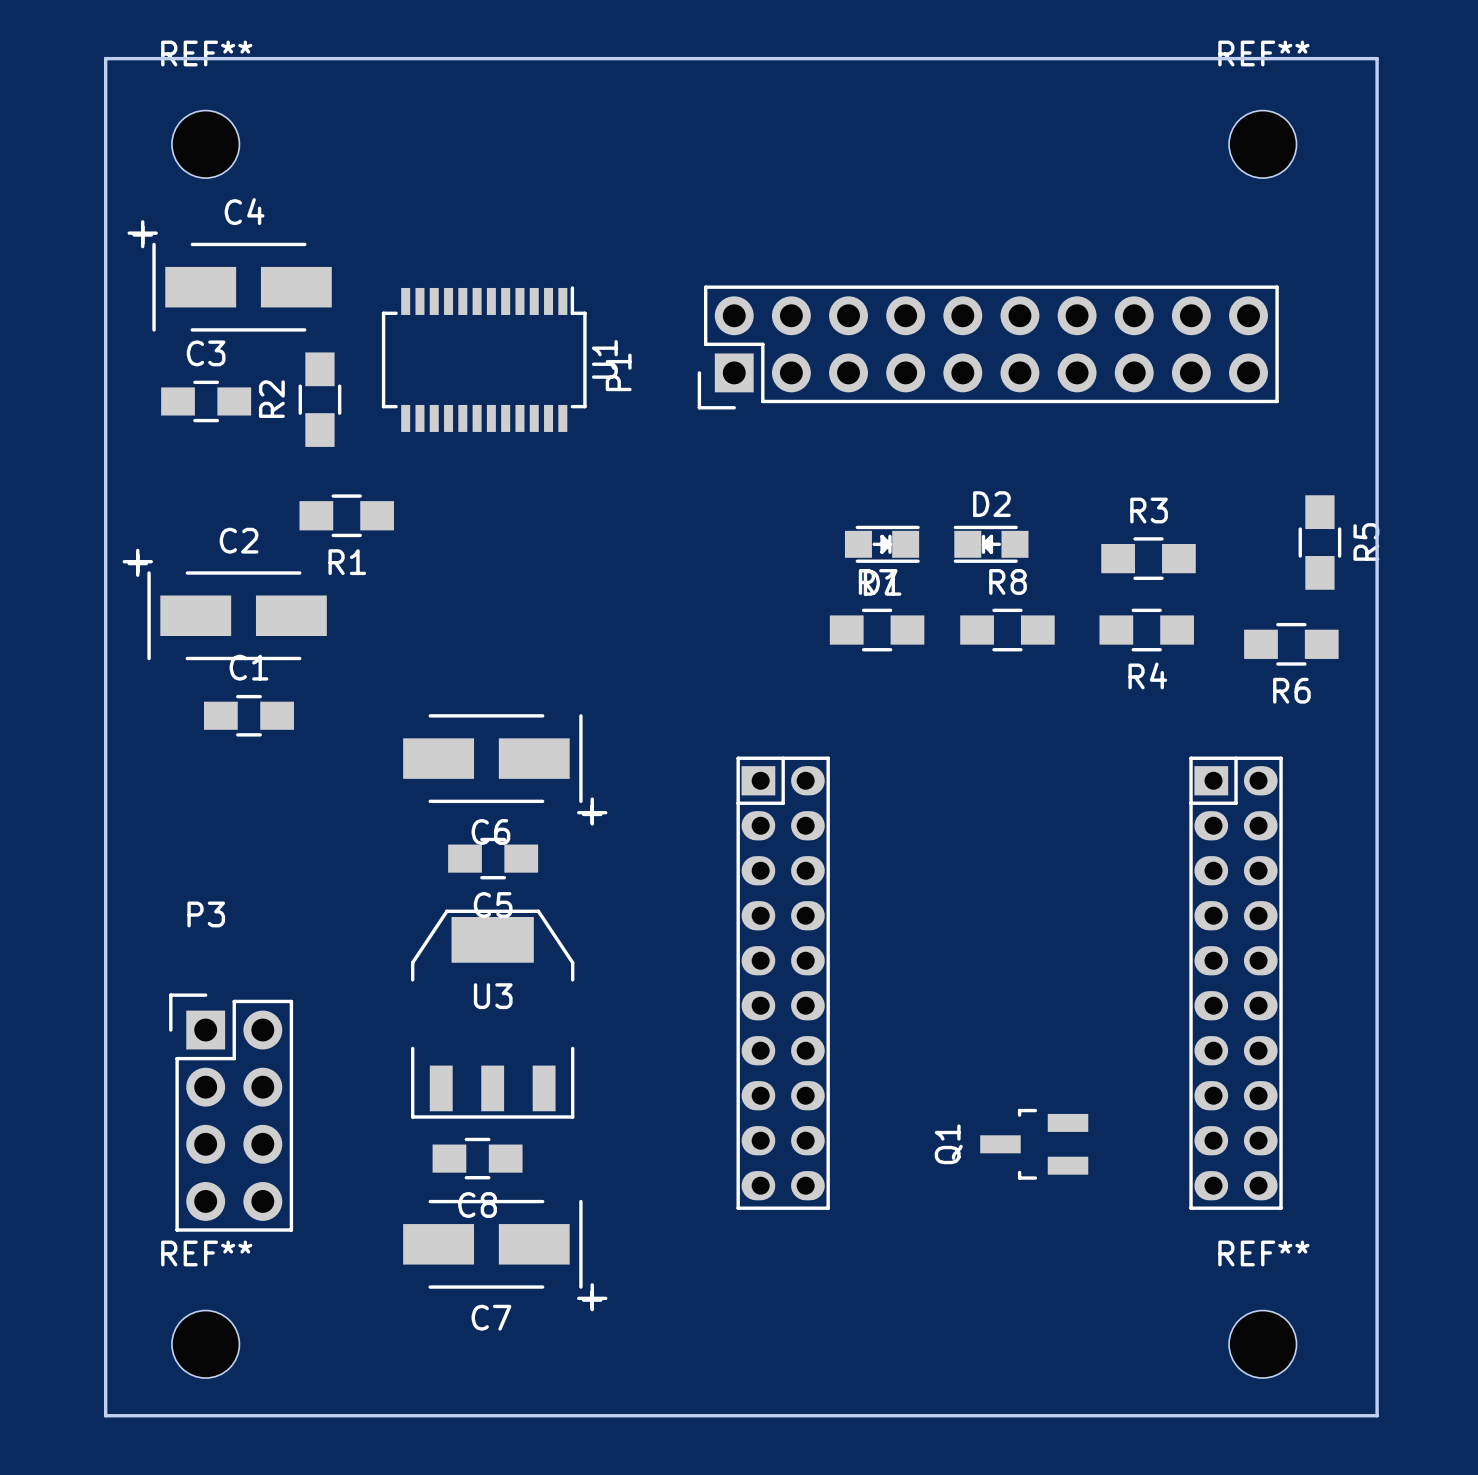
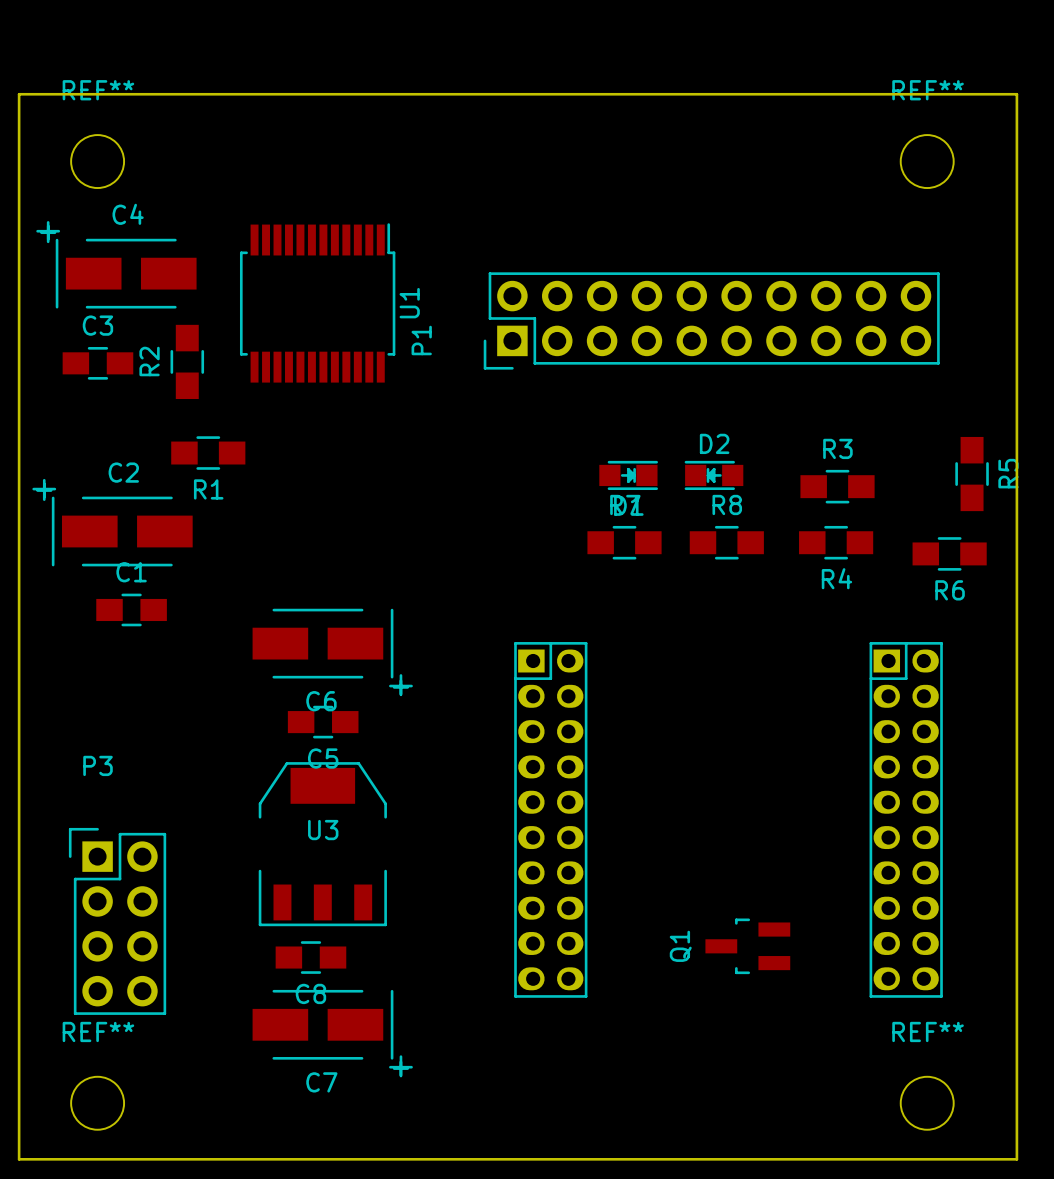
U1 footprint: [381, 286, 587, 432] -> [239, 223, 396, 383]

